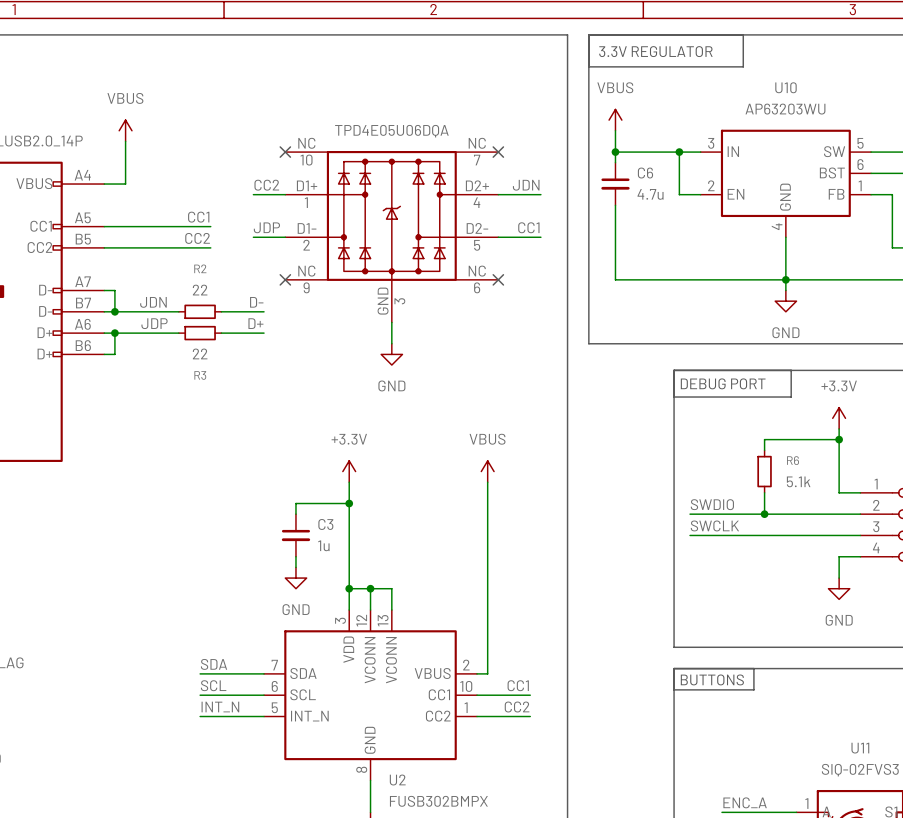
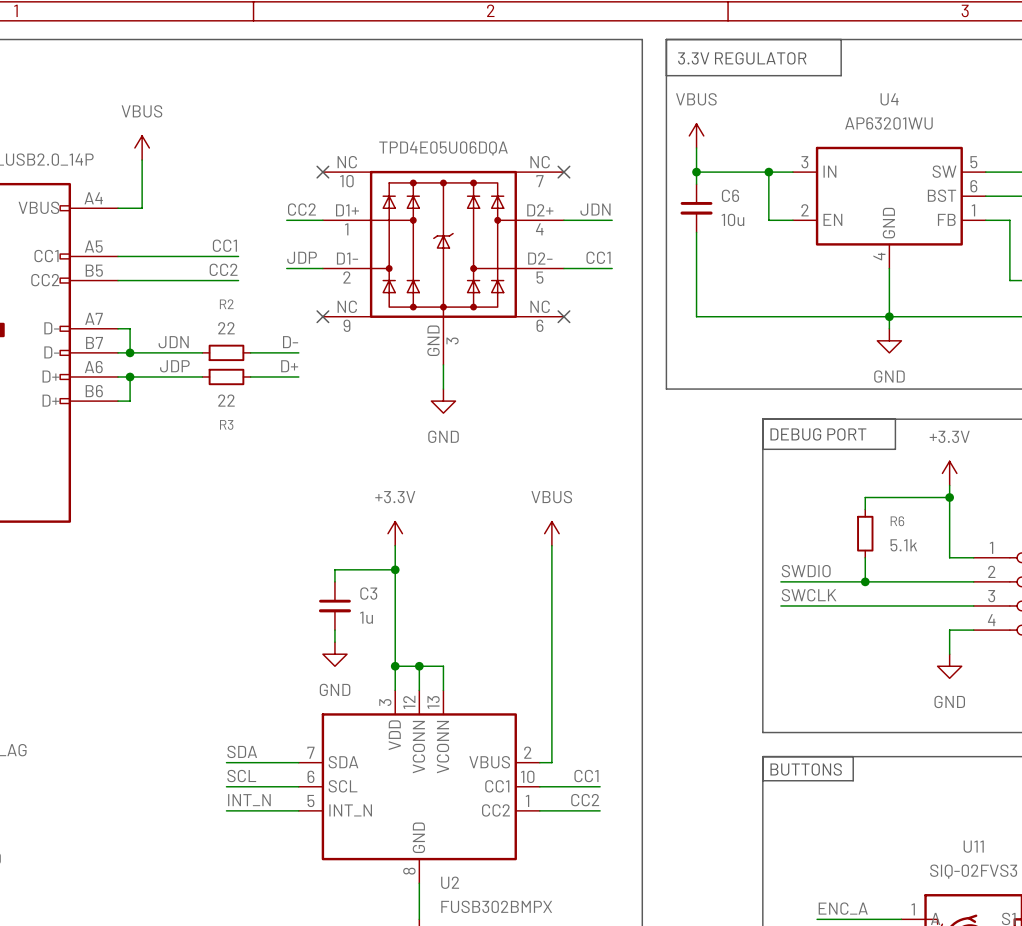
U10 name: U10 (785, 87) -> U4 (889, 99)
U10 value: AP63203WU (785, 109) -> AP63201WU (888, 123)
C6 value: 4.7u (650, 194) -> 10u (732, 219)

